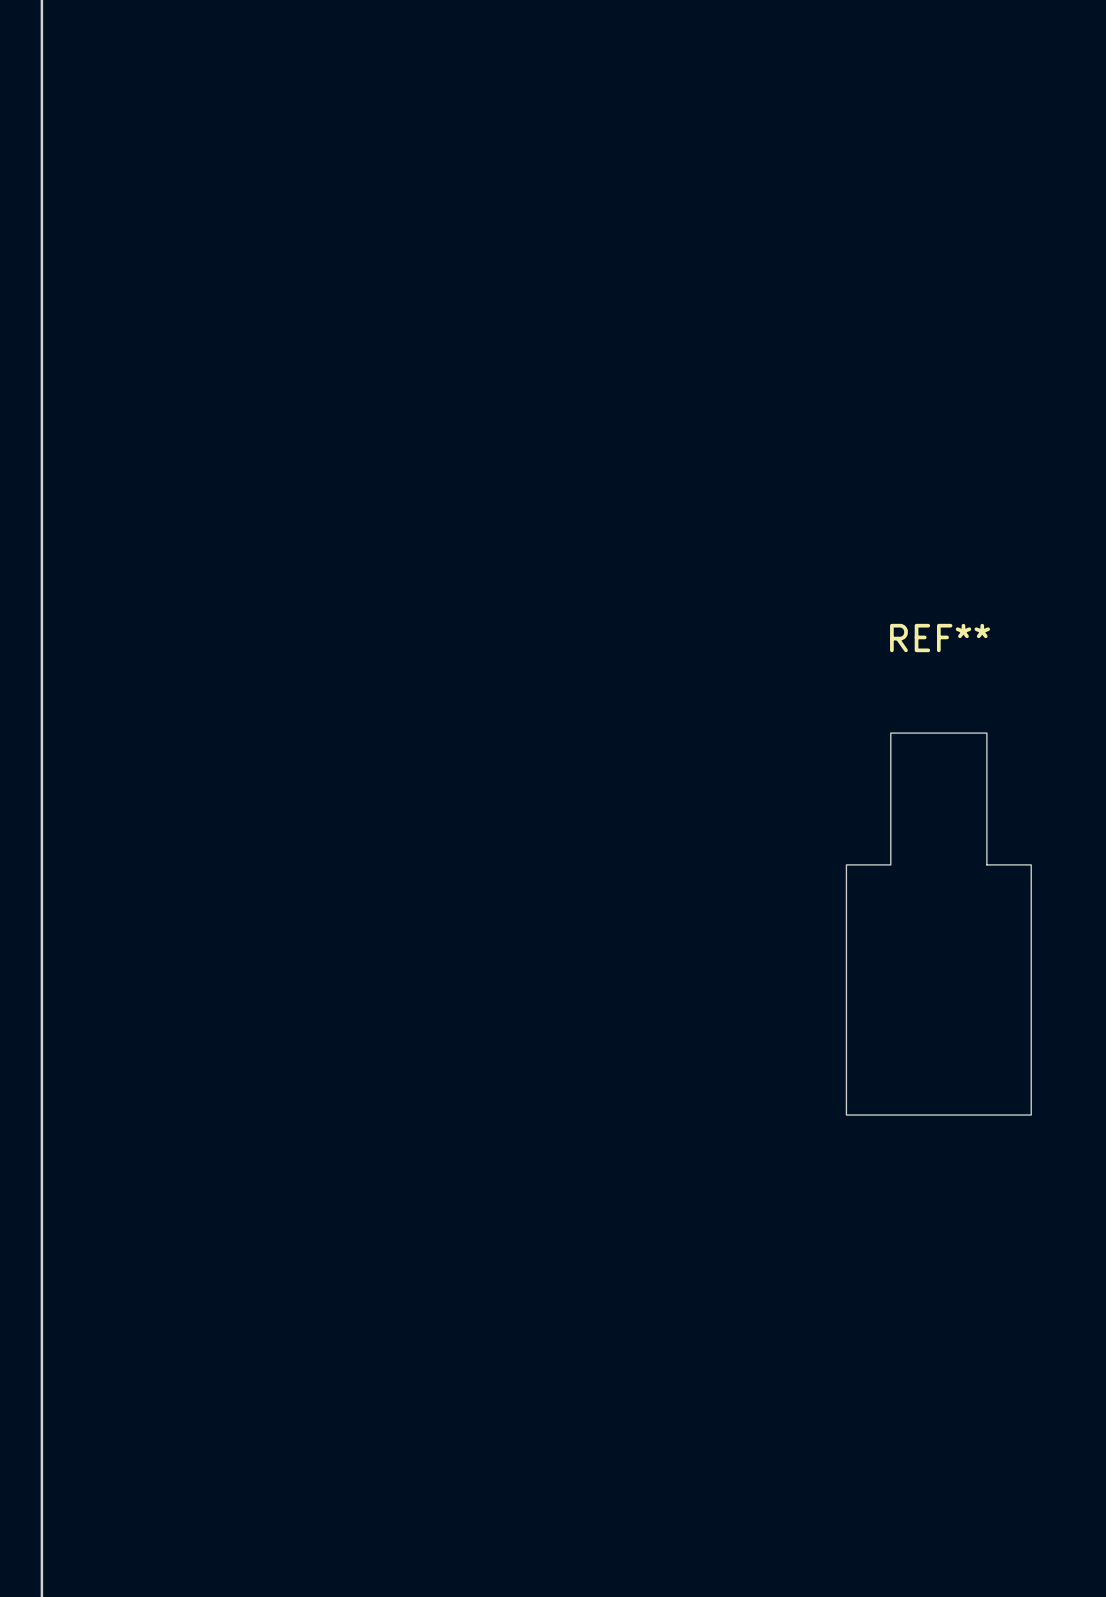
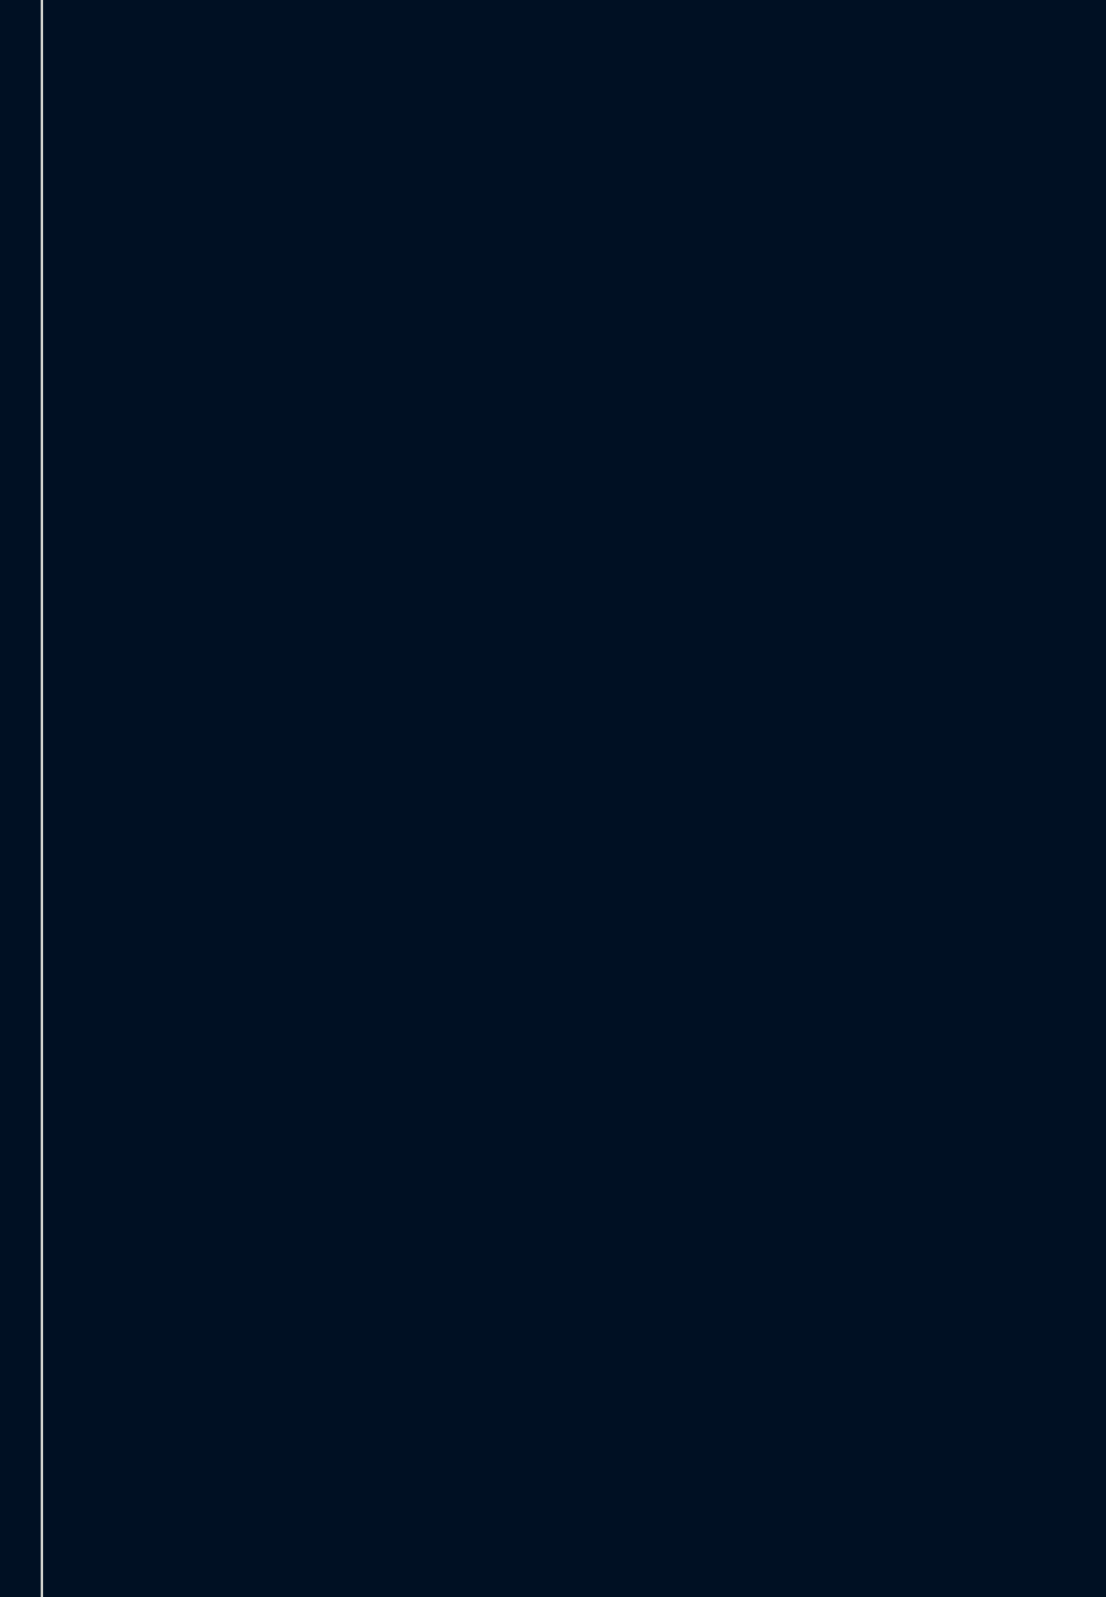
REF**: (938, 924) -> none

